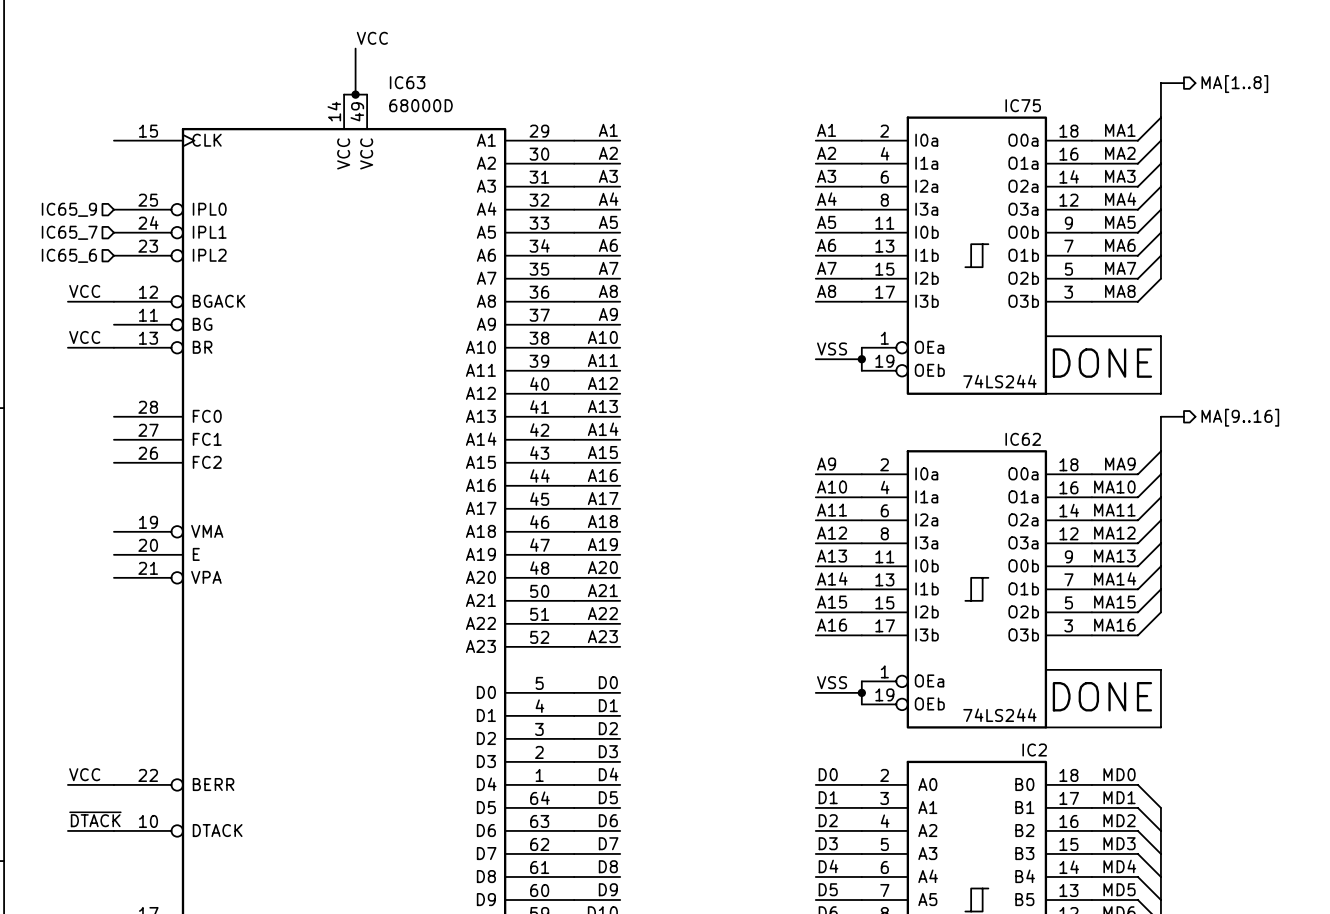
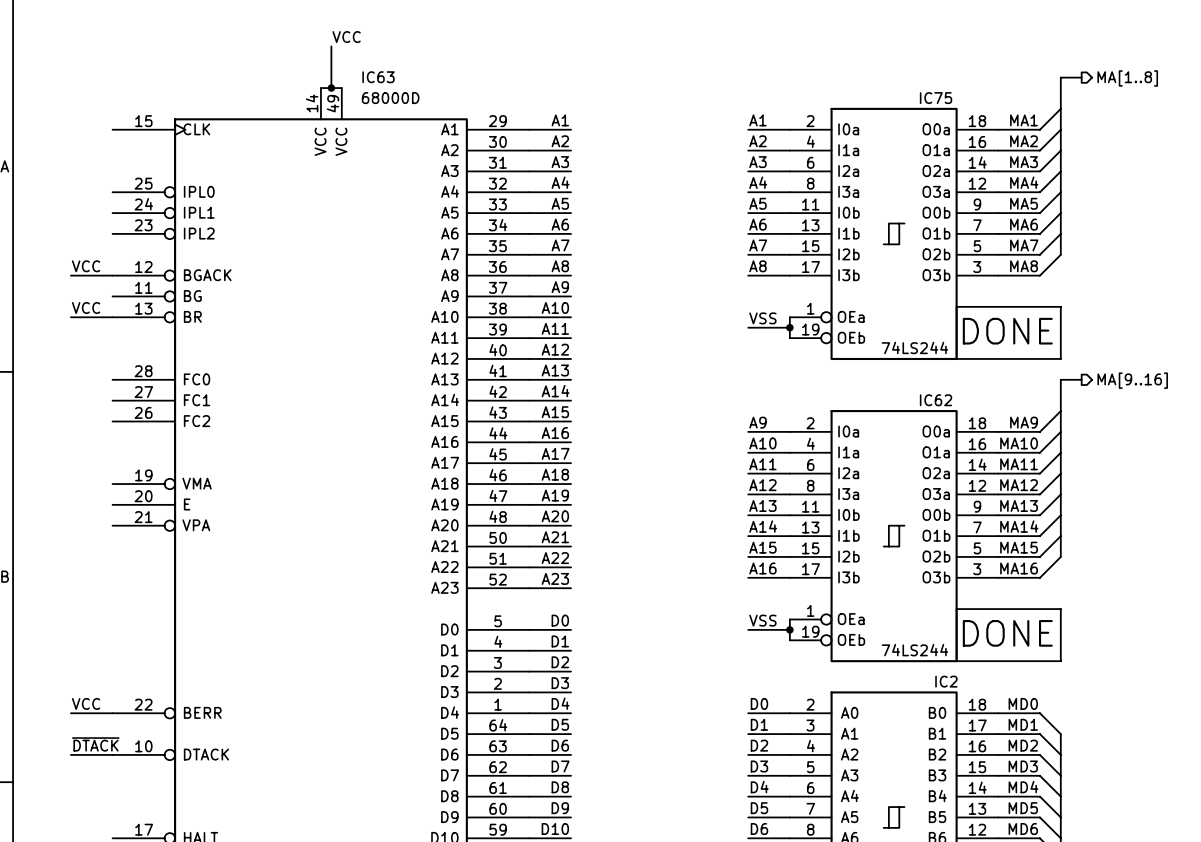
hierarchical label: IC65_9 (69, 209) -> none
hierarchical label: IC65_7 (69, 232) -> none
hierarchical label: IC65_6 (69, 255) -> none

